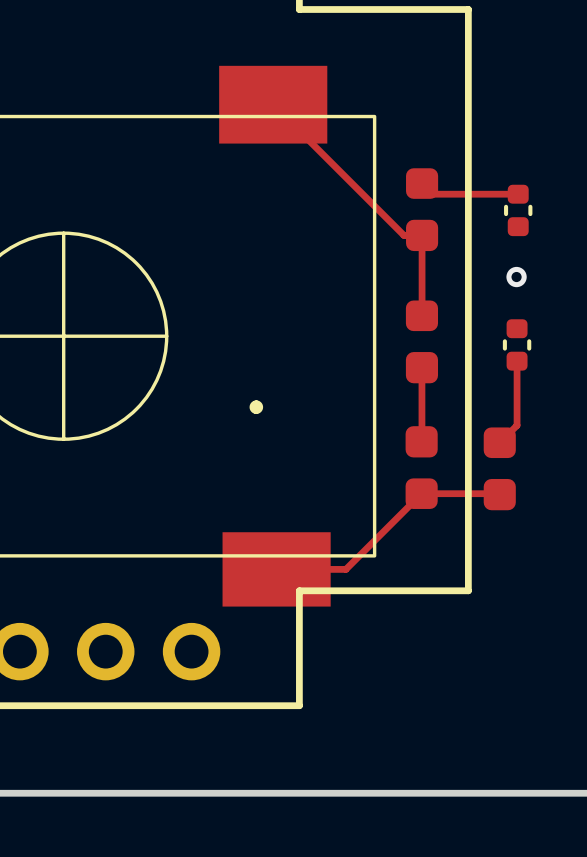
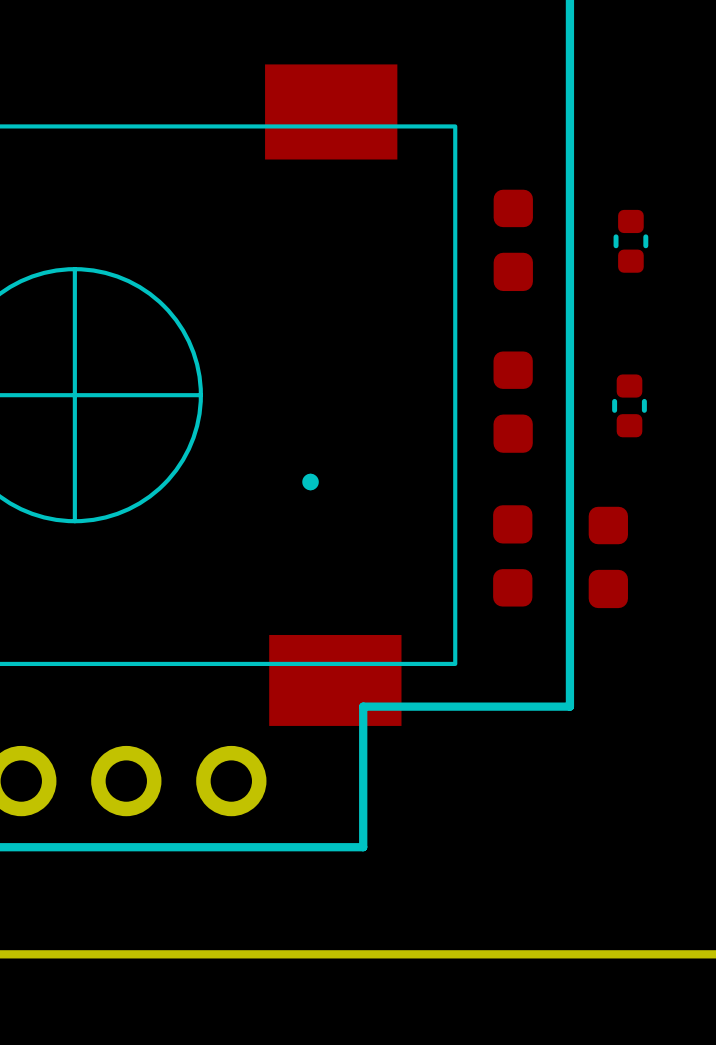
top track: (273, 104) (403, 235) (422, 235) (422, 315) -> none
top track: (422, 183) (432, 194) (518, 194) -> none
via: (516, 277) -> none
top track: (517, 361) (517, 425) (499, 442) -> none
top track: (421, 367) (421, 441) -> none
top track: (499, 494) (421, 493) (345, 569) (276, 569) -> none

